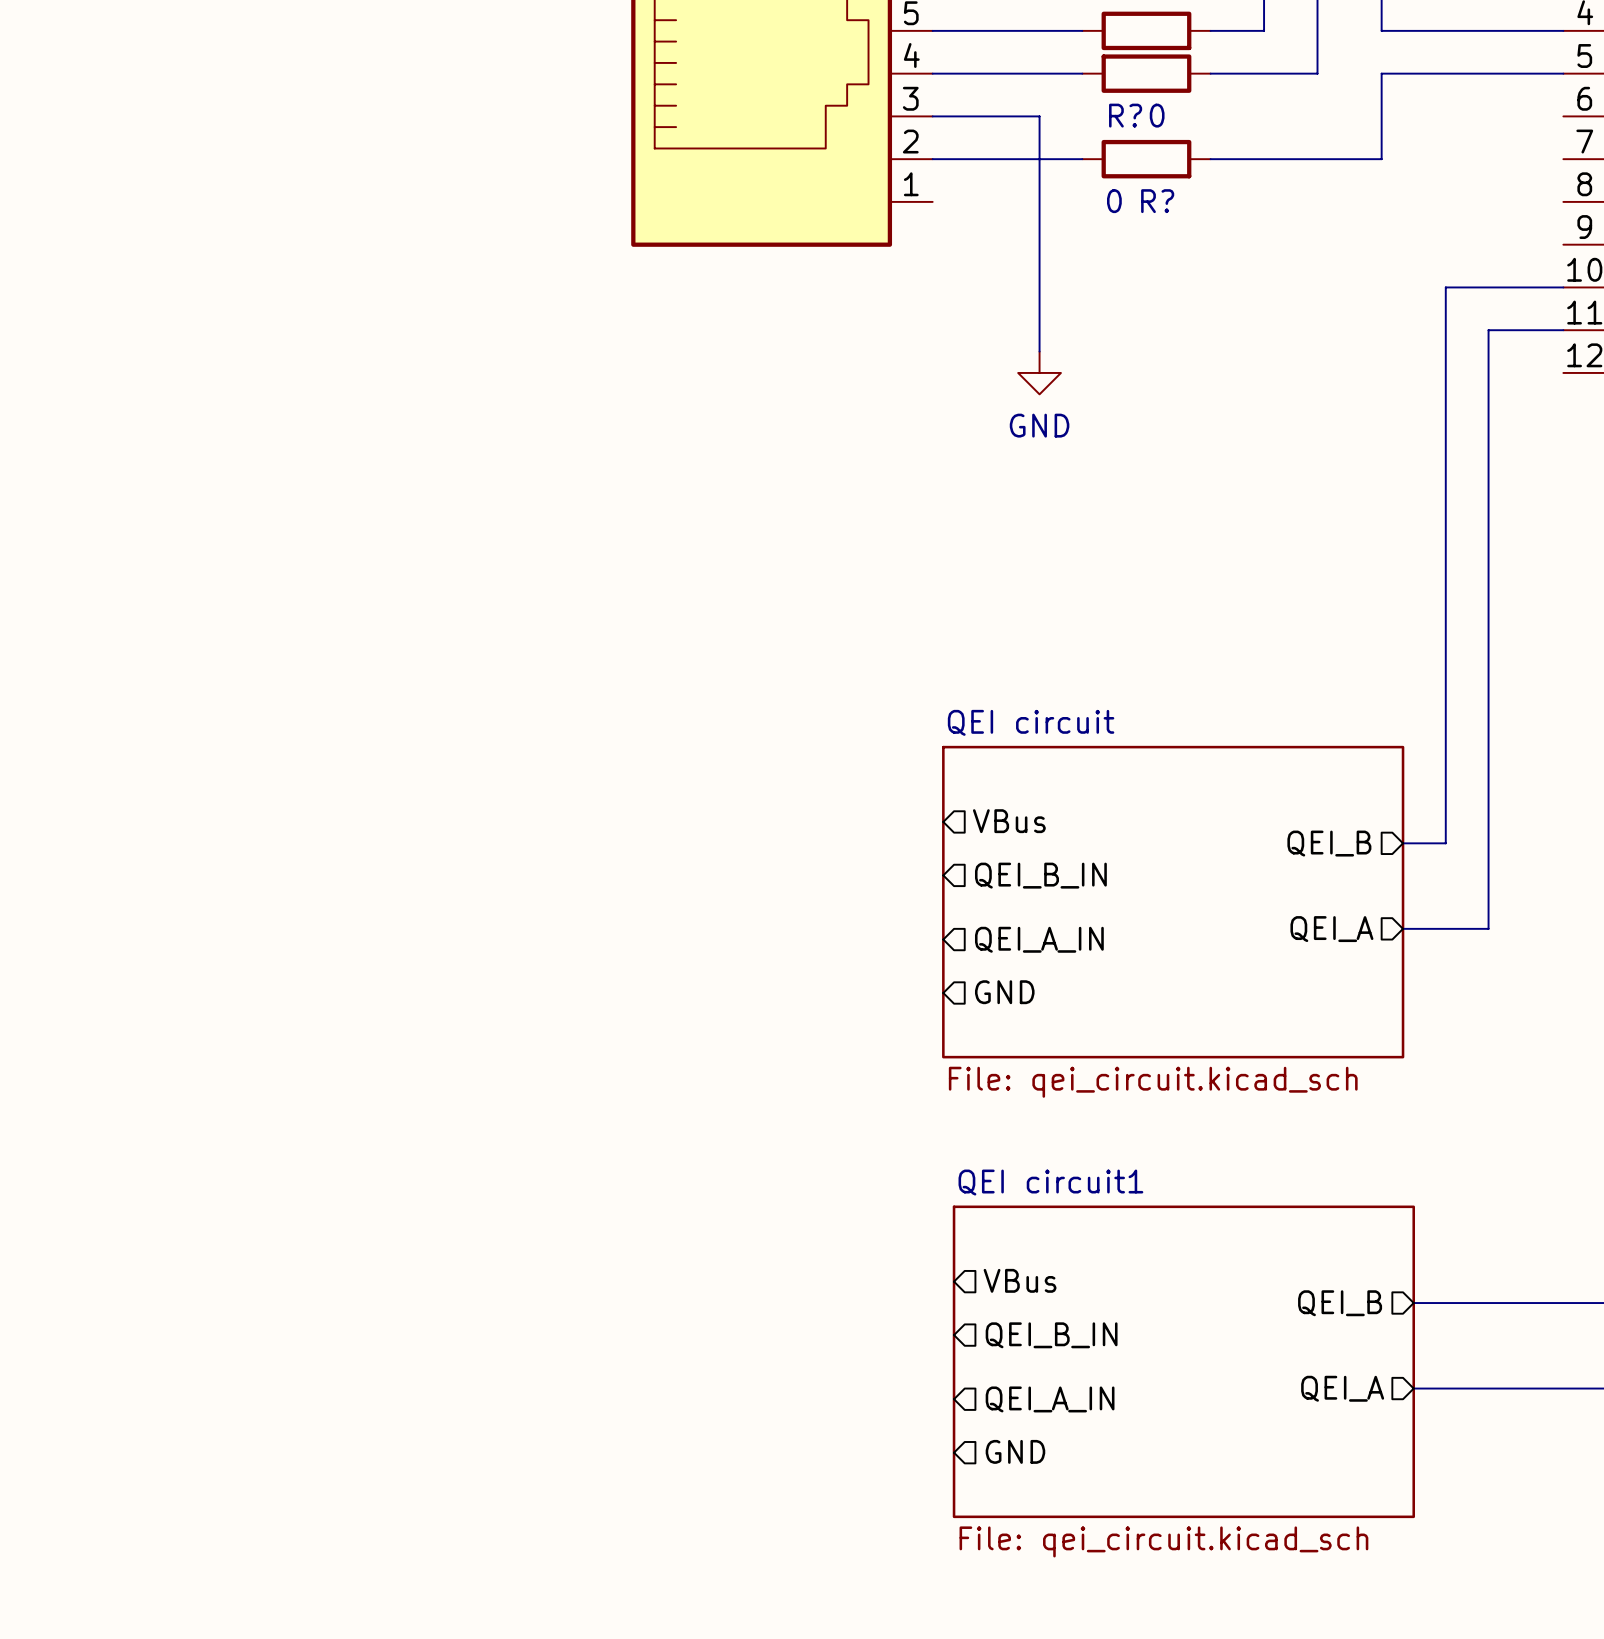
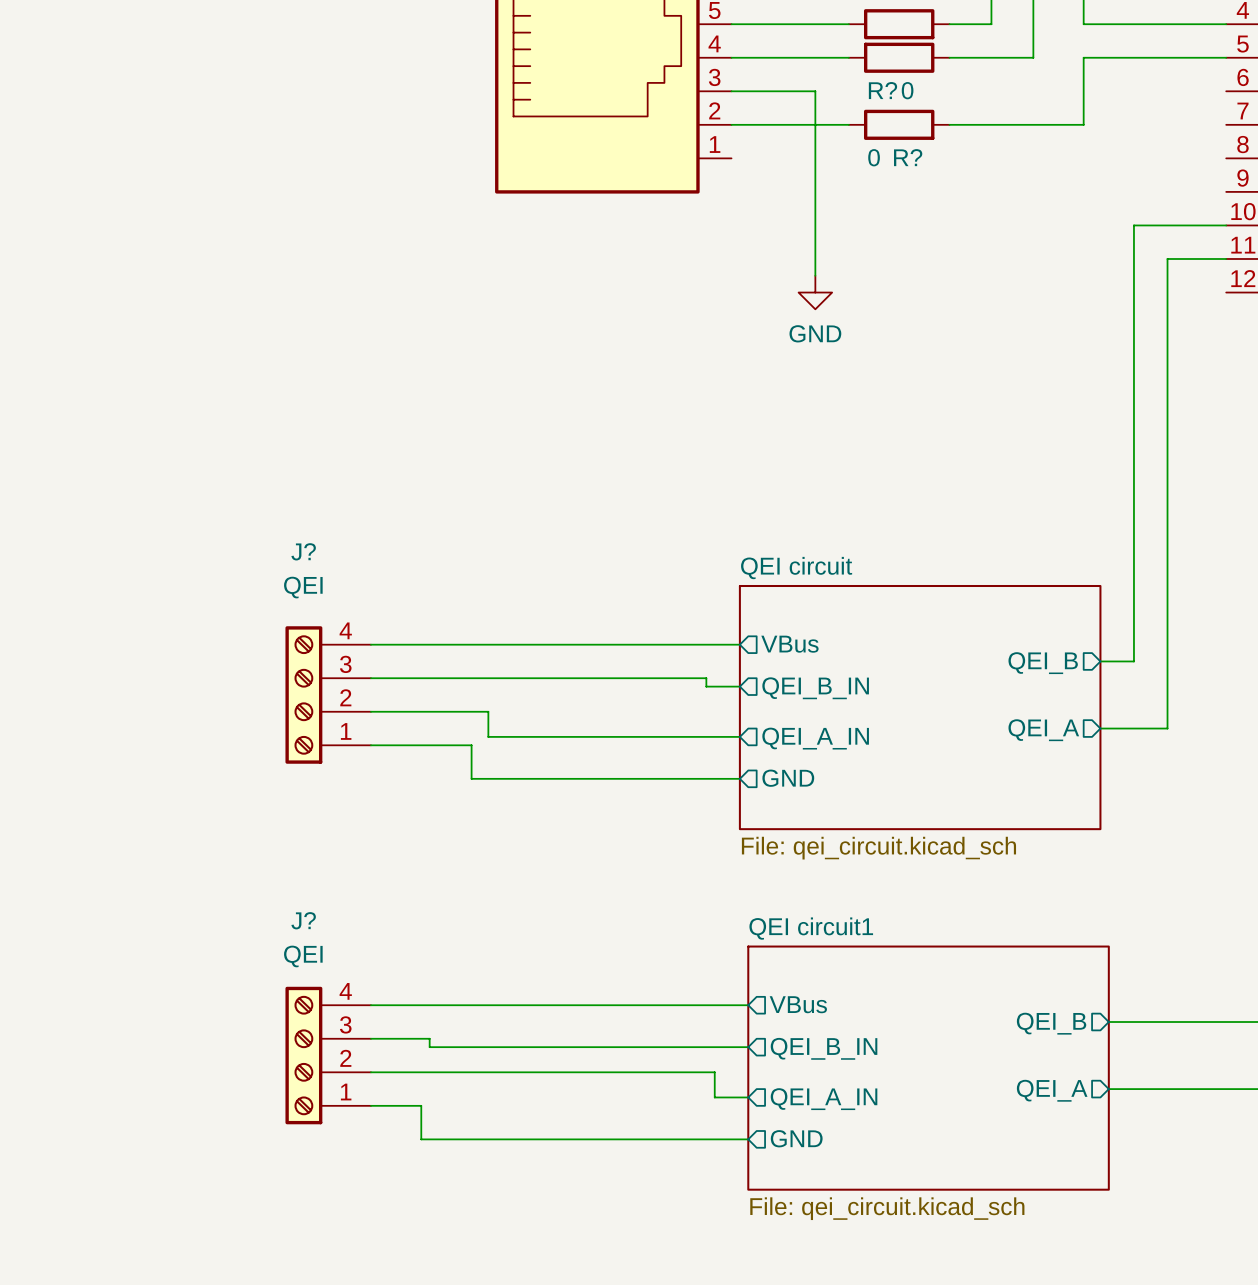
wire: none -> (370, 644) (739, 644)
wire: none -> (370, 678) (706, 678) (706, 686) (739, 686)
J?: none -> QEI (328, 695)
wire: none -> (370, 711) (488, 711) (488, 736) (739, 736)
wire: none -> (370, 745) (471, 745) (471, 778) (739, 778)
wire: none -> (370, 1005) (748, 1005)
wire: none -> (370, 1038) (429, 1038) (429, 1047) (748, 1047)
J?: none -> QEI (328, 1055)
wire: none -> (370, 1072) (714, 1072) (714, 1097) (748, 1097)
wire: none -> (370, 1105) (421, 1105) (421, 1139) (748, 1139)

